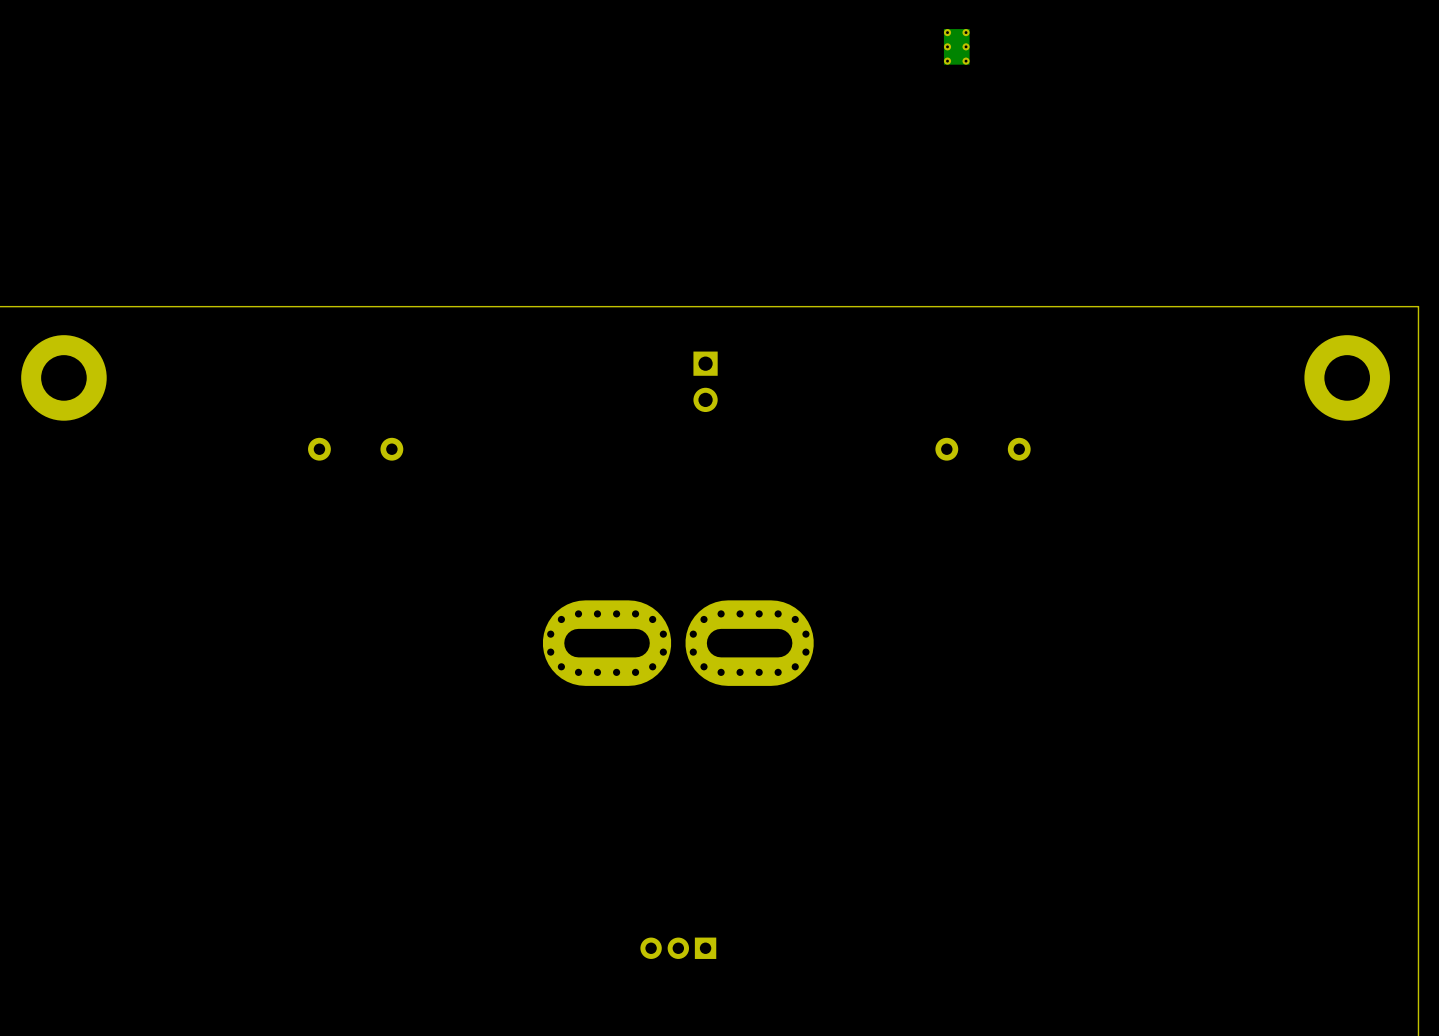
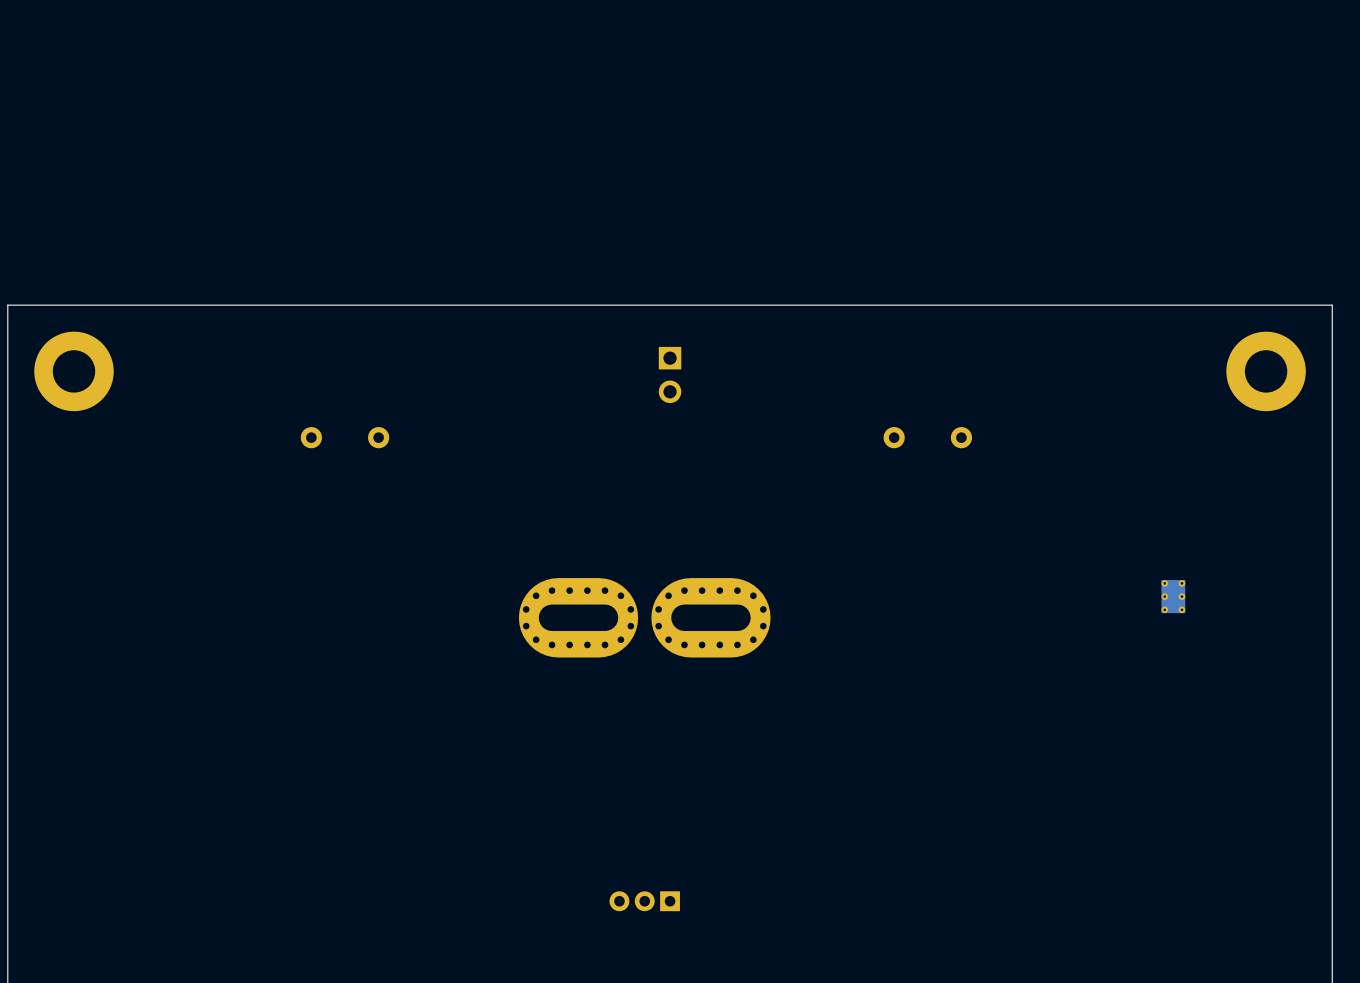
part: (956, 46) -> none
part: none -> (1173, 596)

